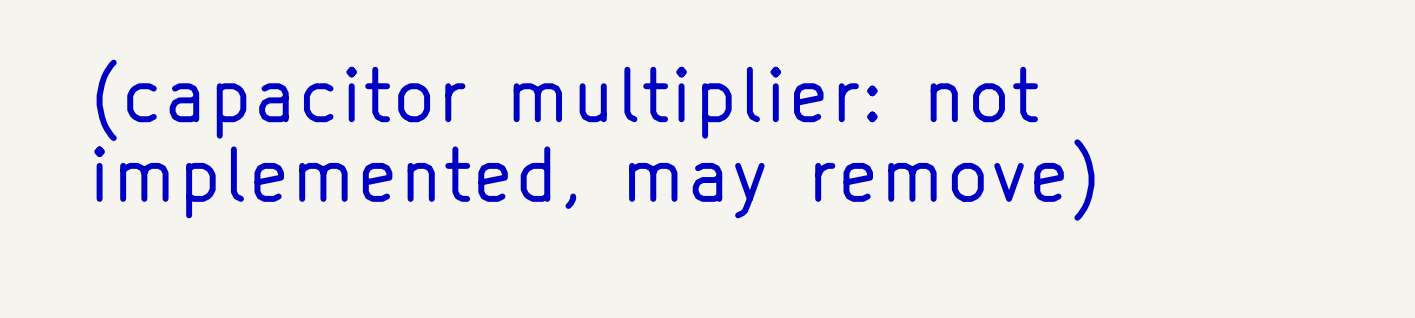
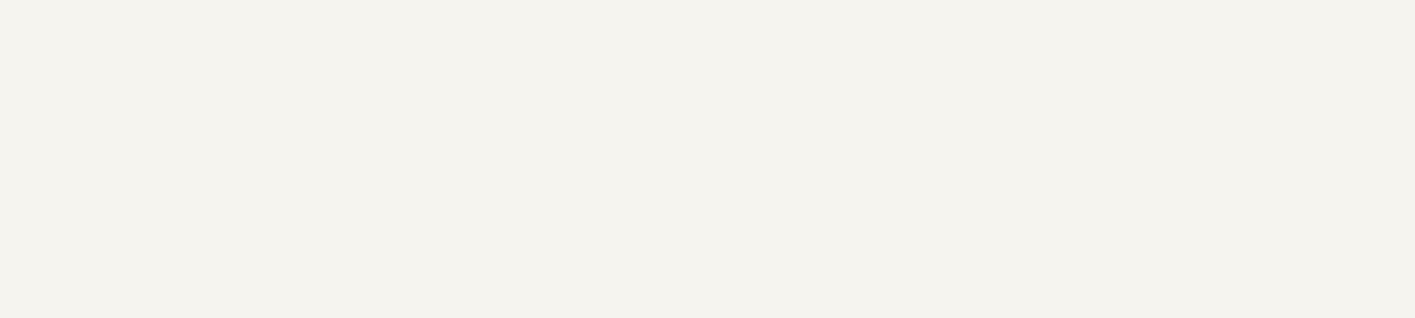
text: (capacitor multiplier: not (567, 100) -> none
text: implemented, may remove) (594, 180) -> none

